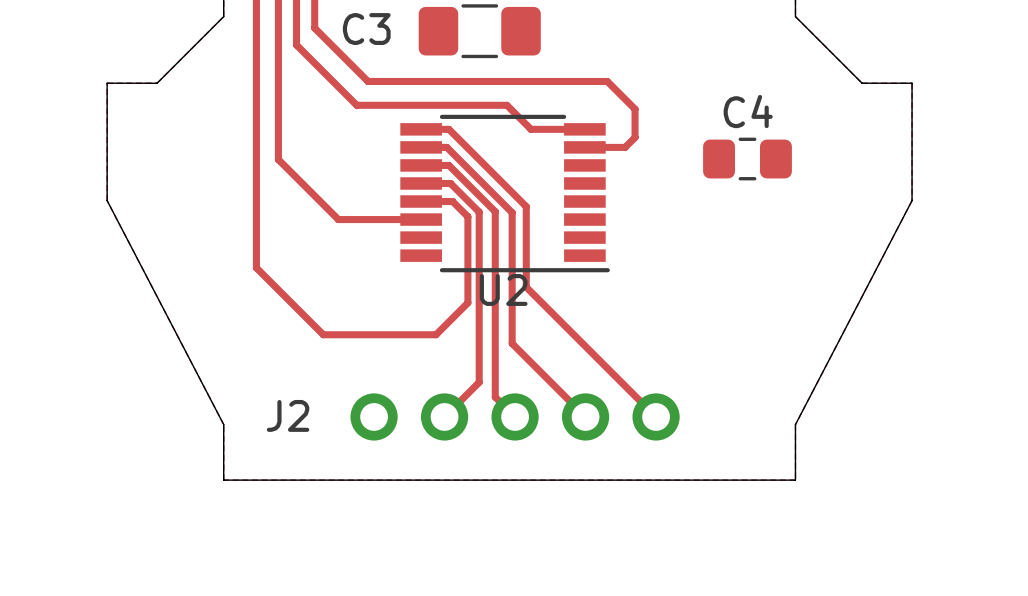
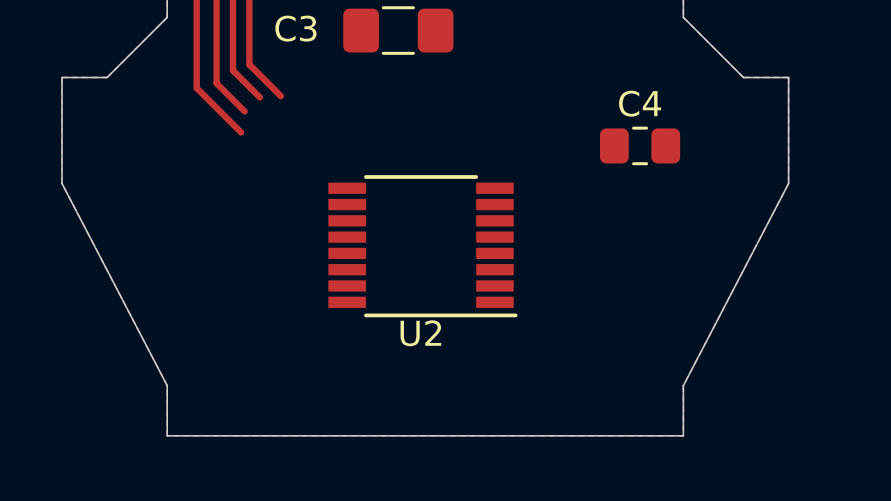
top track: (314, 28) (368, 81) (607, 81) (635, 109) (635, 137) (625, 147) (584, 147) -> (249, 27) (249, 64) (280, 96)
top track: (296, 45) (356, 105) (506, 105) (531, 129) (584, 129) -> (232, 43) (232, 70) (259, 97)
top track: (278, 89) (278, 159) (338, 219) (421, 219) -> (216, 83) (244, 111)
top track: (256, 94) (256, 267) (323, 334) (436, 334) (467, 302) (467, 216) (452, 201) (421, 201) -> (196, 88) (241, 132)
top track: (421, 129) (449, 129) (526, 206) (526, 287) (656, 416) -> none
top track: (421, 147) (446, 147) (512, 212) (512, 343) (585, 416) -> none
top track: (421, 165) (449, 165) (495, 211) (495, 397) (515, 416) -> none
top track: (421, 183) (450, 183) (479, 212) (479, 382) (444, 416) -> none
U2 position: (505, 193) -> (422, 246)
J2: (515, 416) -> none

